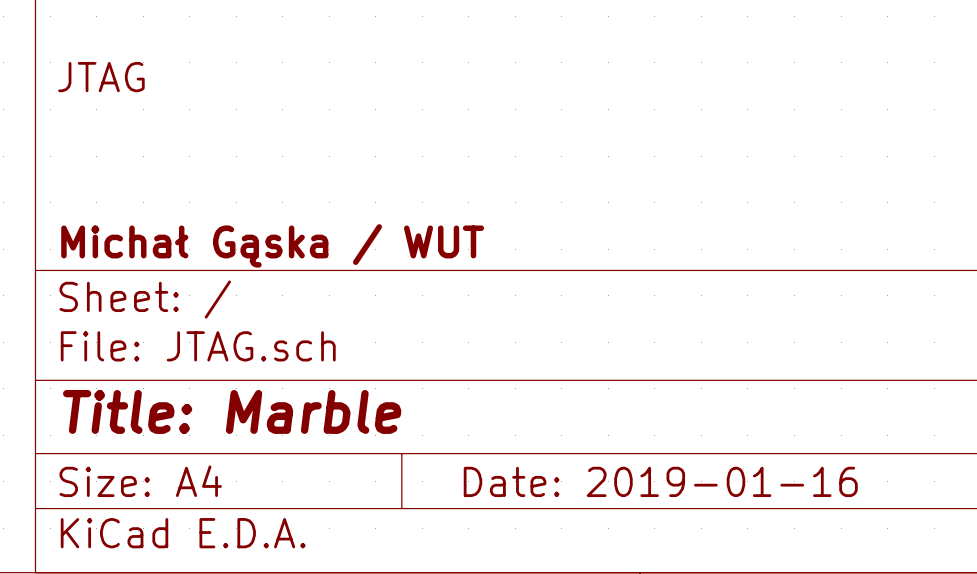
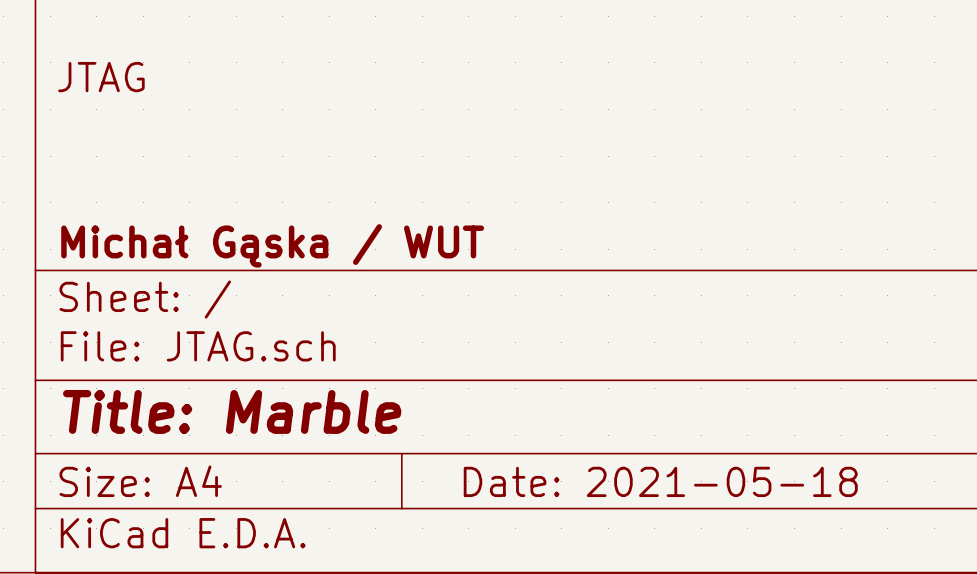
title block: Date: 2019-01-16 (660, 481) -> Date: 2021-05-18 (660, 481)

